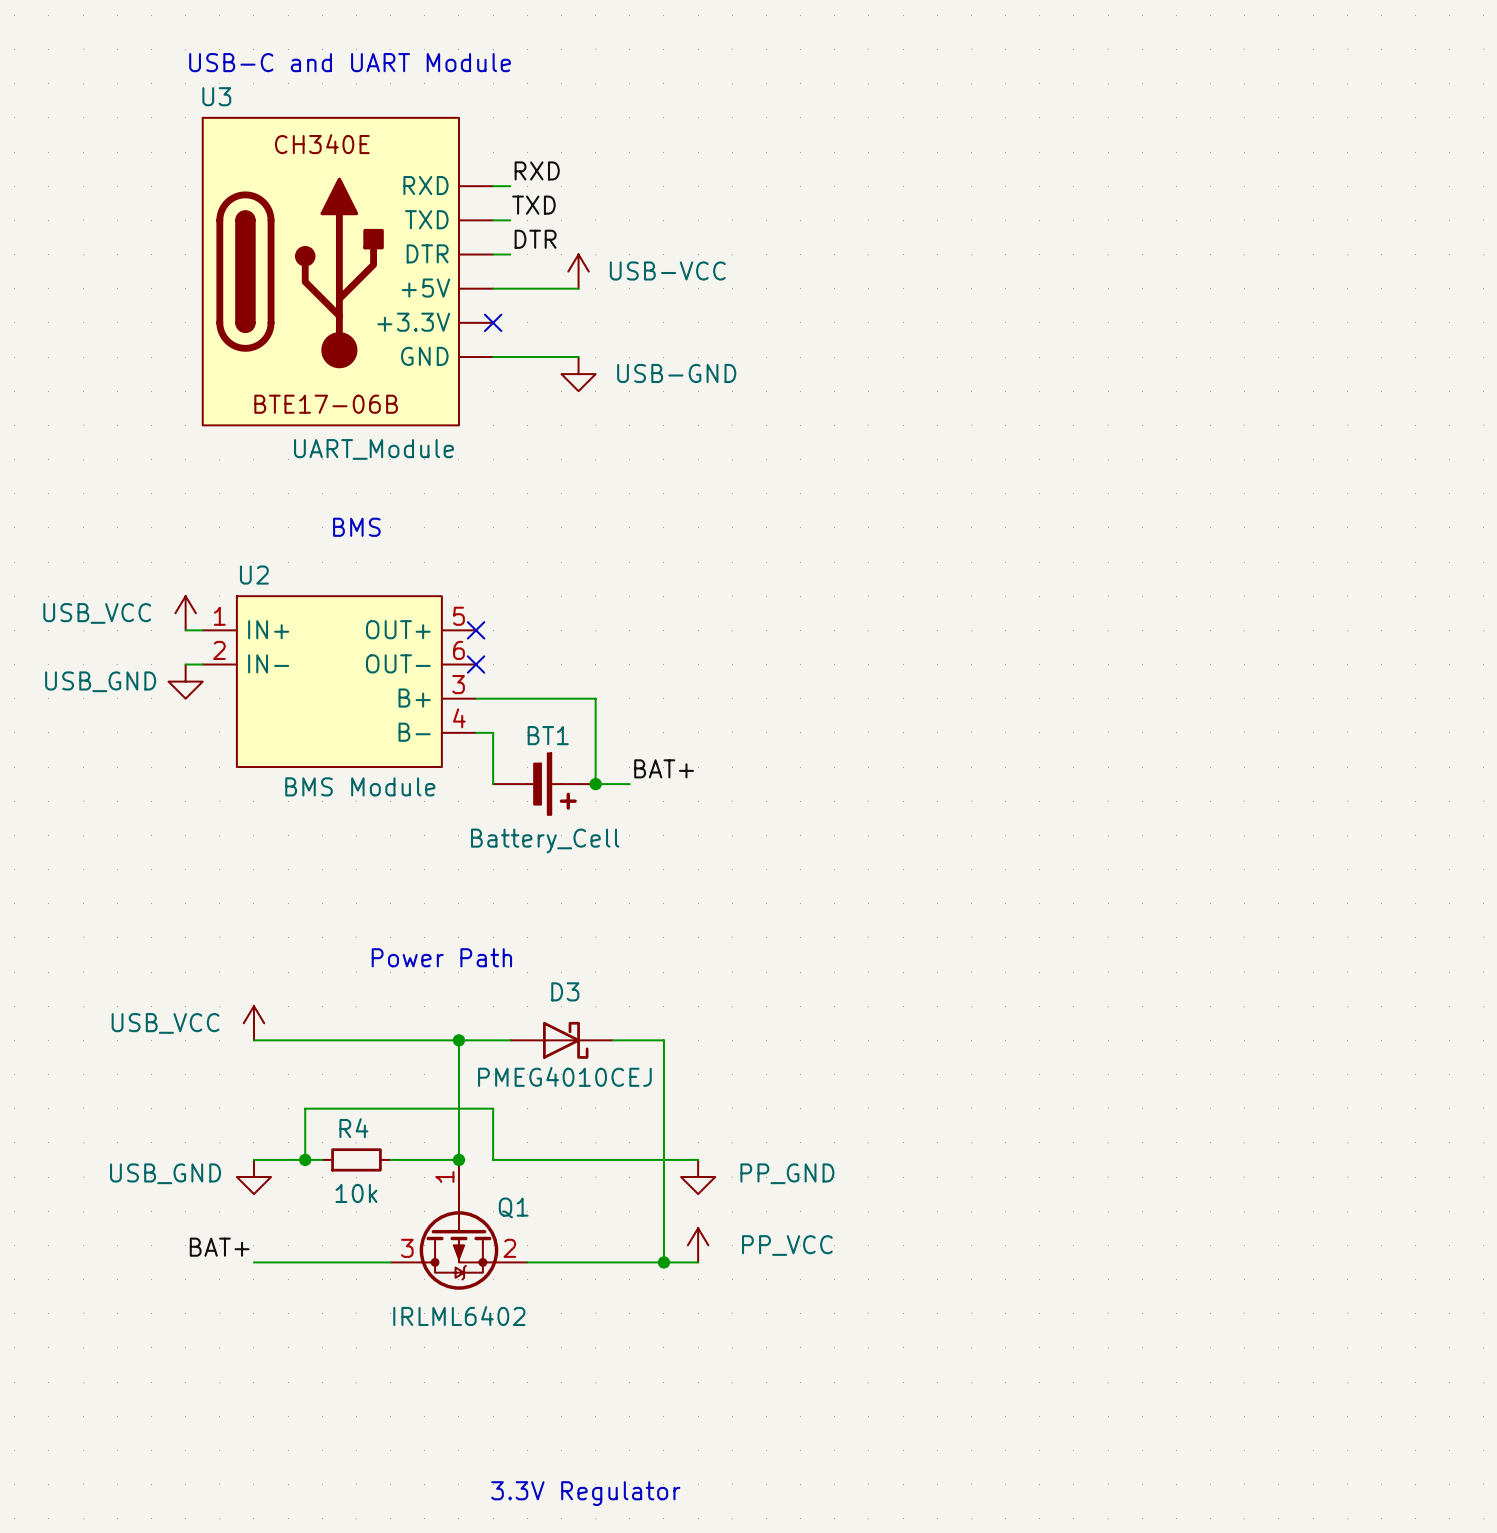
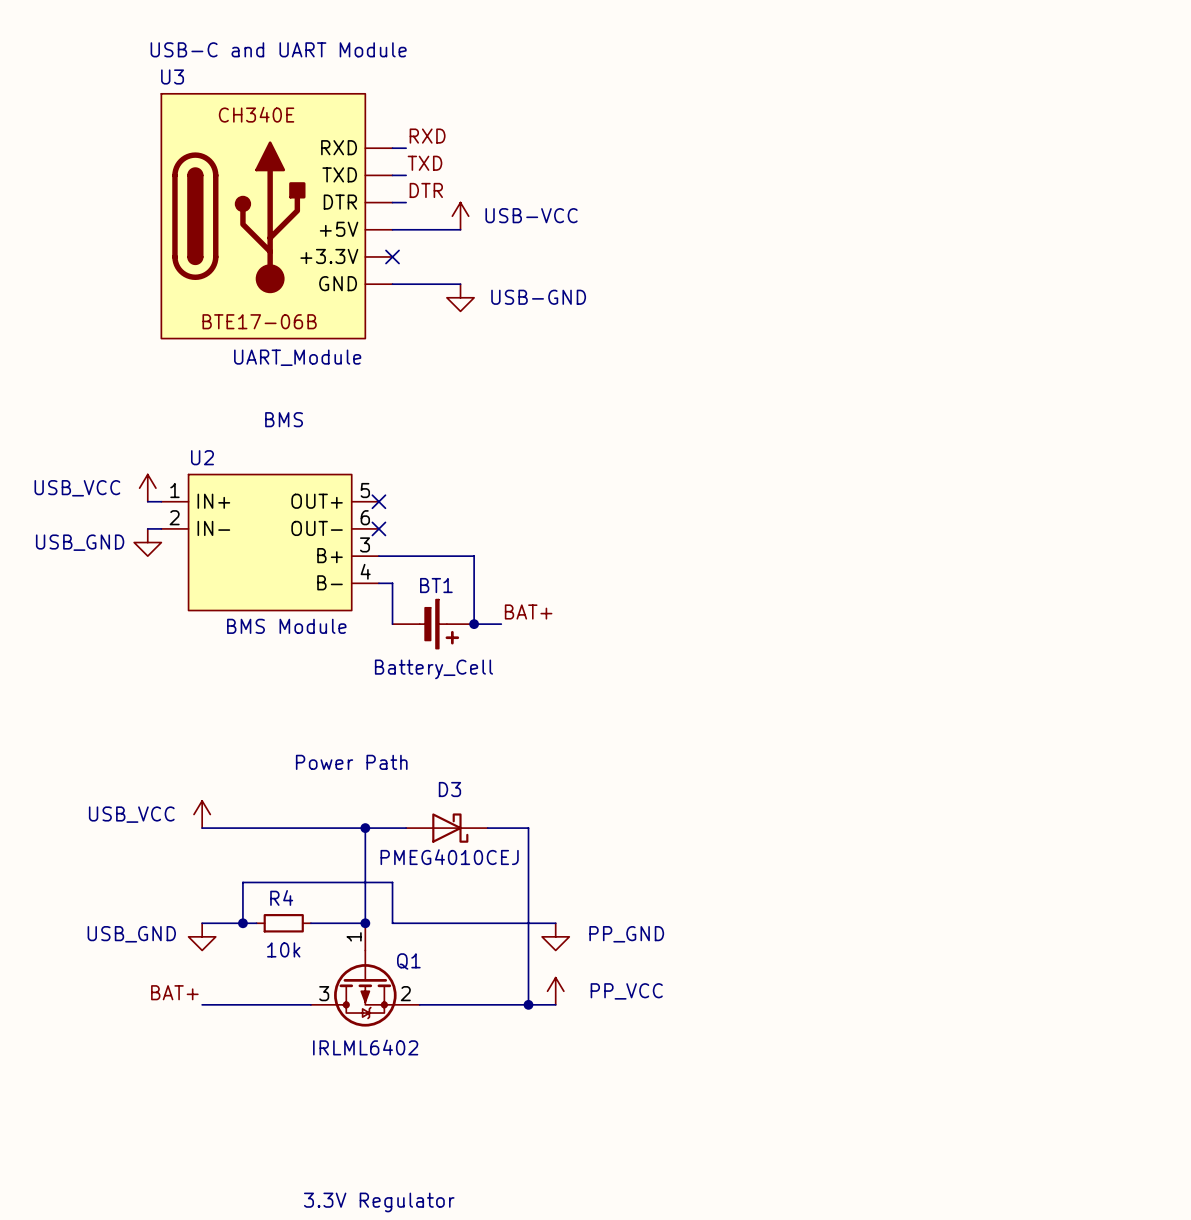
text position: 3.3V Regulator (585, 1493) -> 3.3V Regulator (379, 1202)

